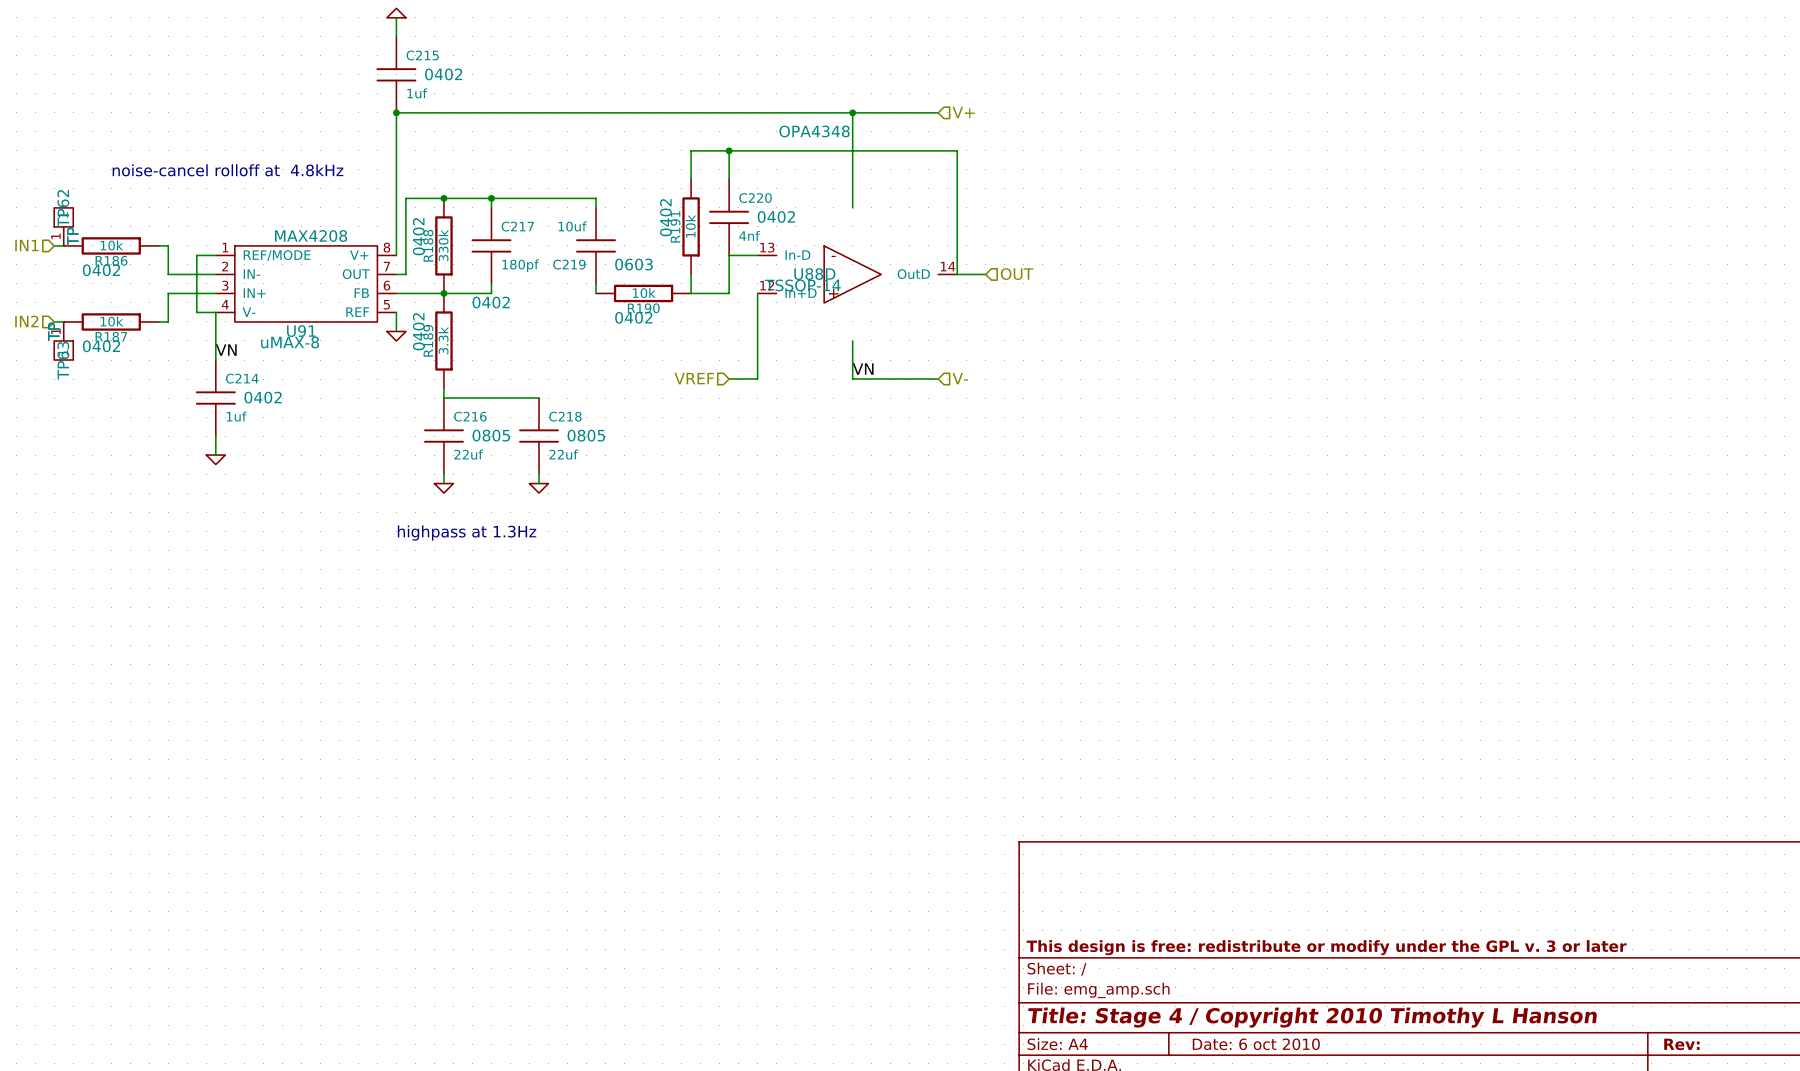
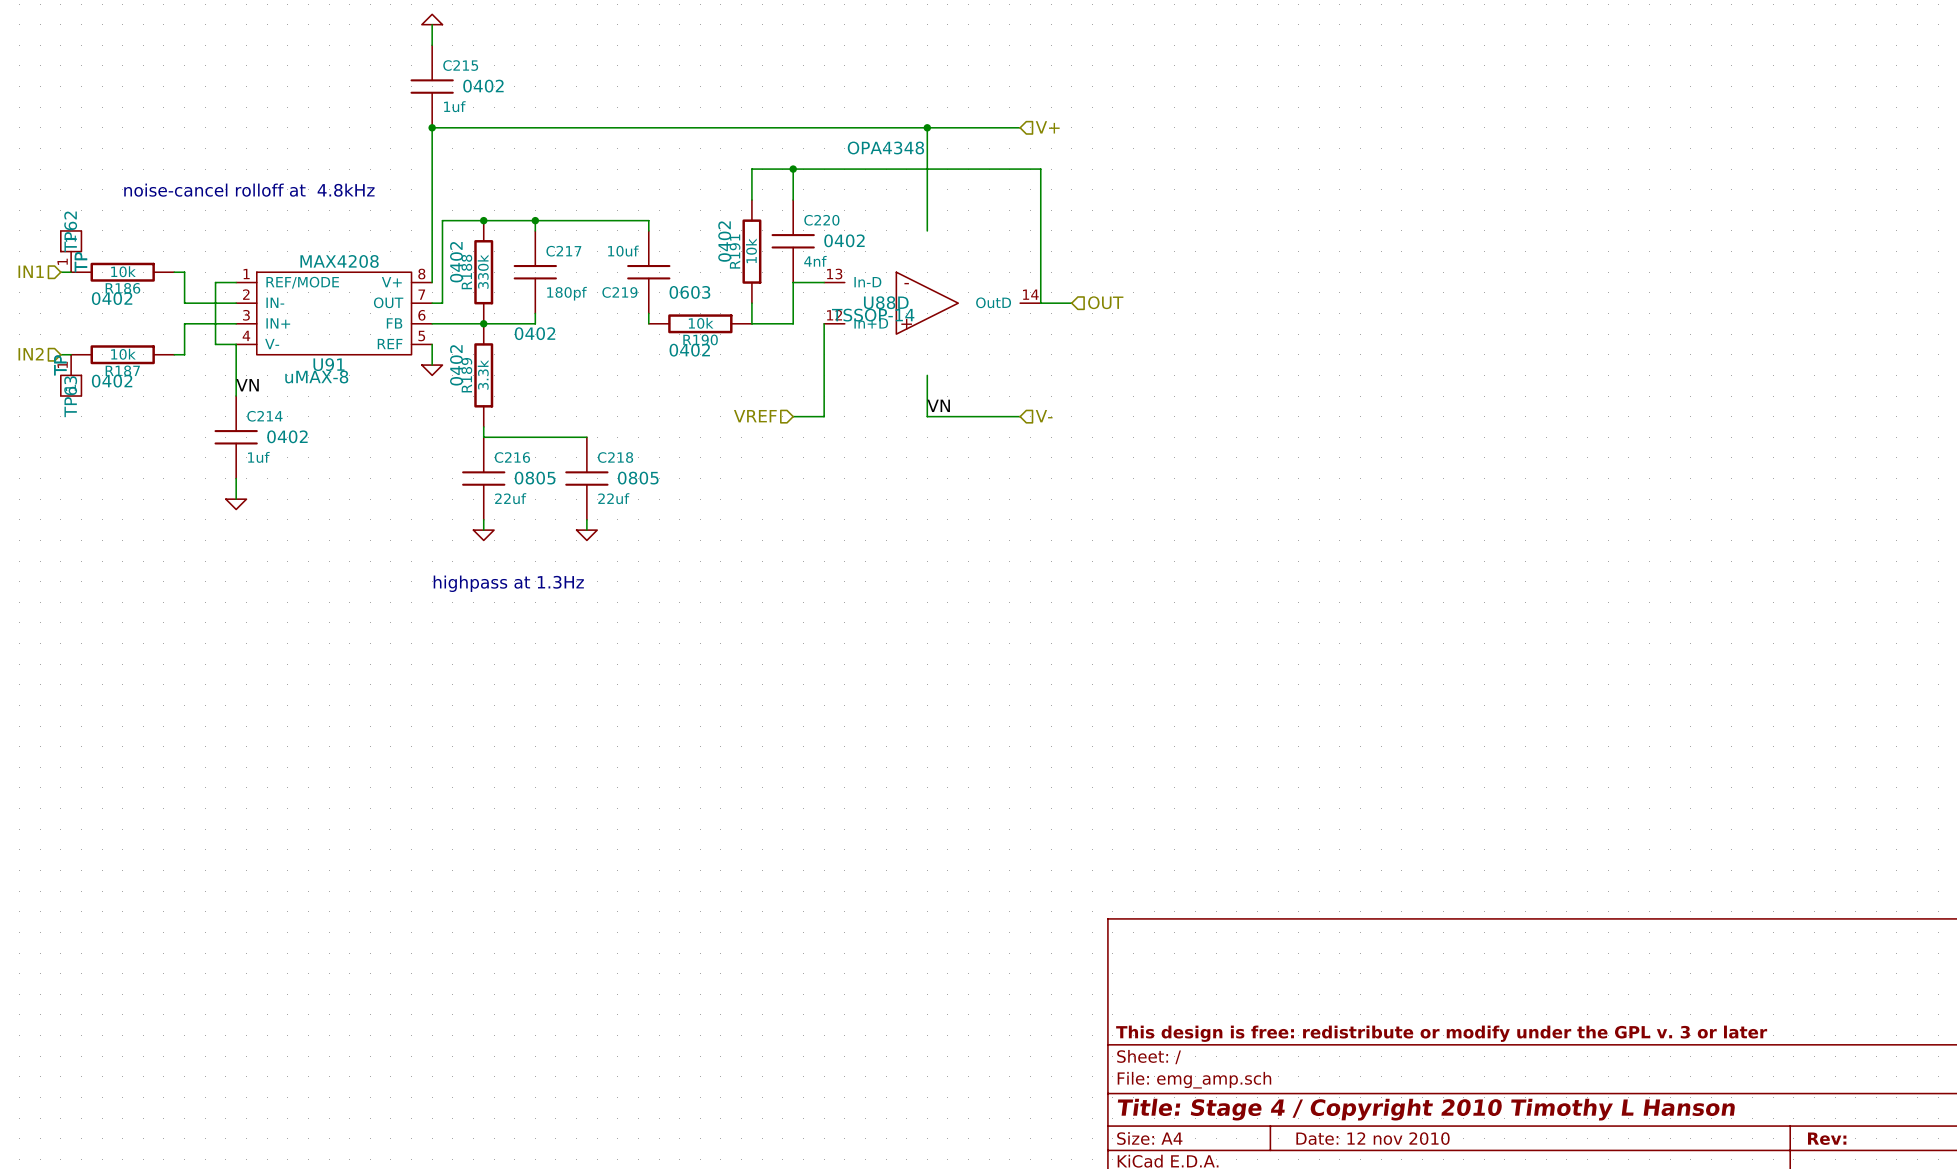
title block: Date: 6 oct 2010 (1256, 1044) -> Date: 12 nov 2010 (1373, 1138)

